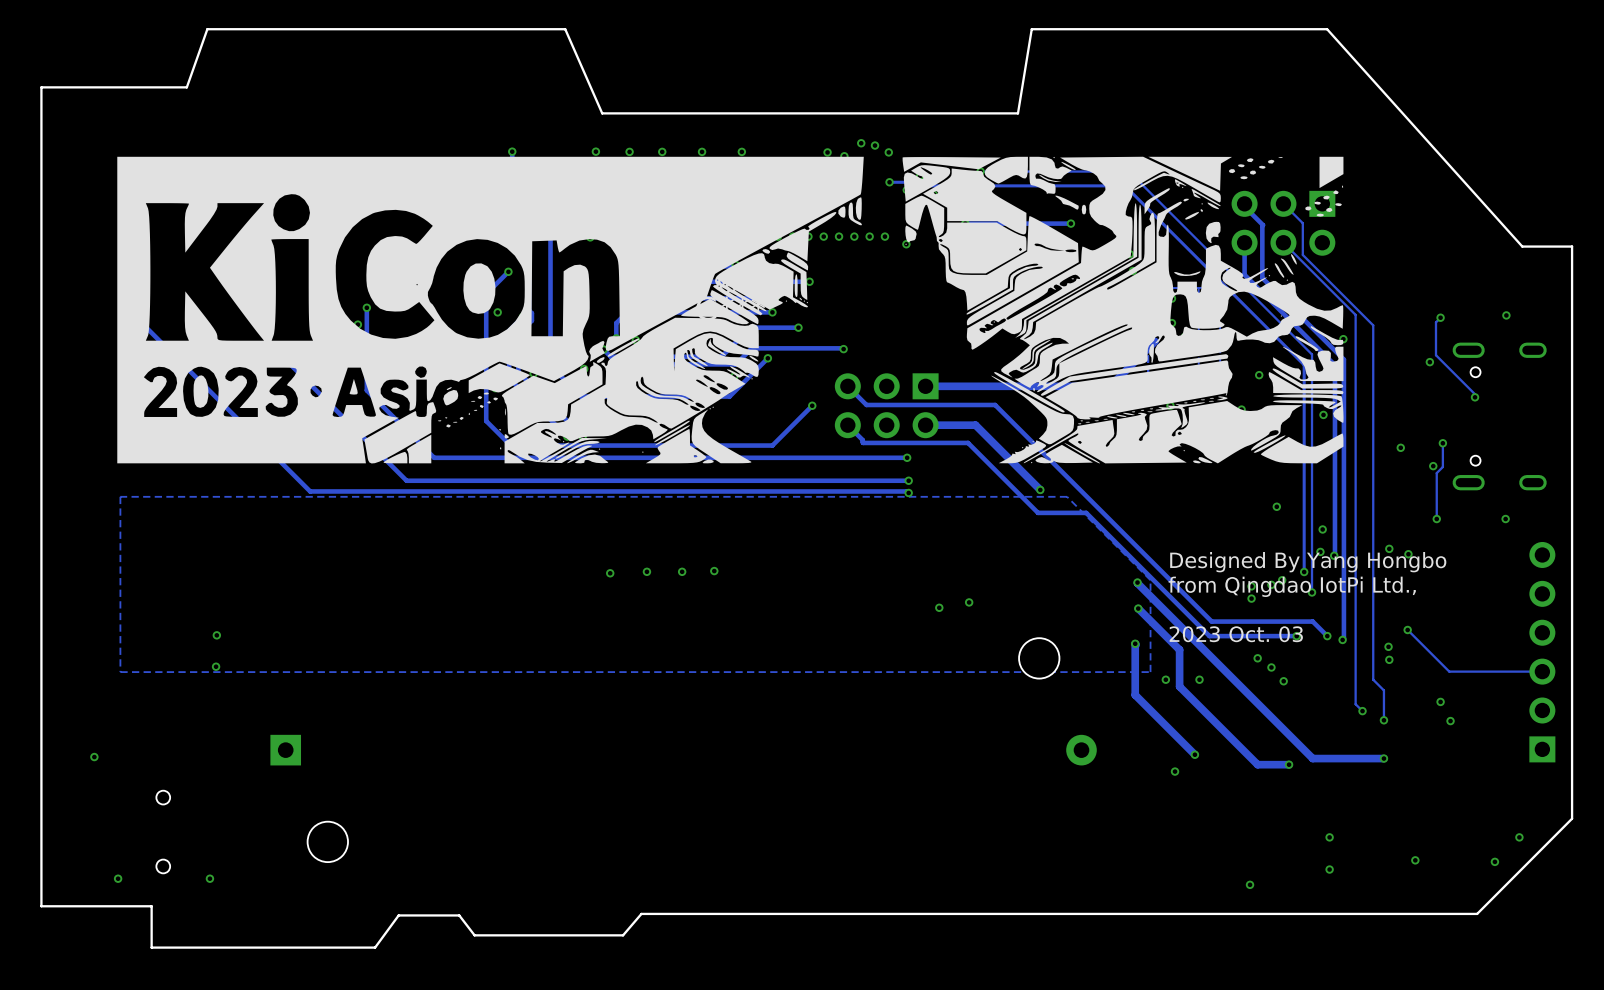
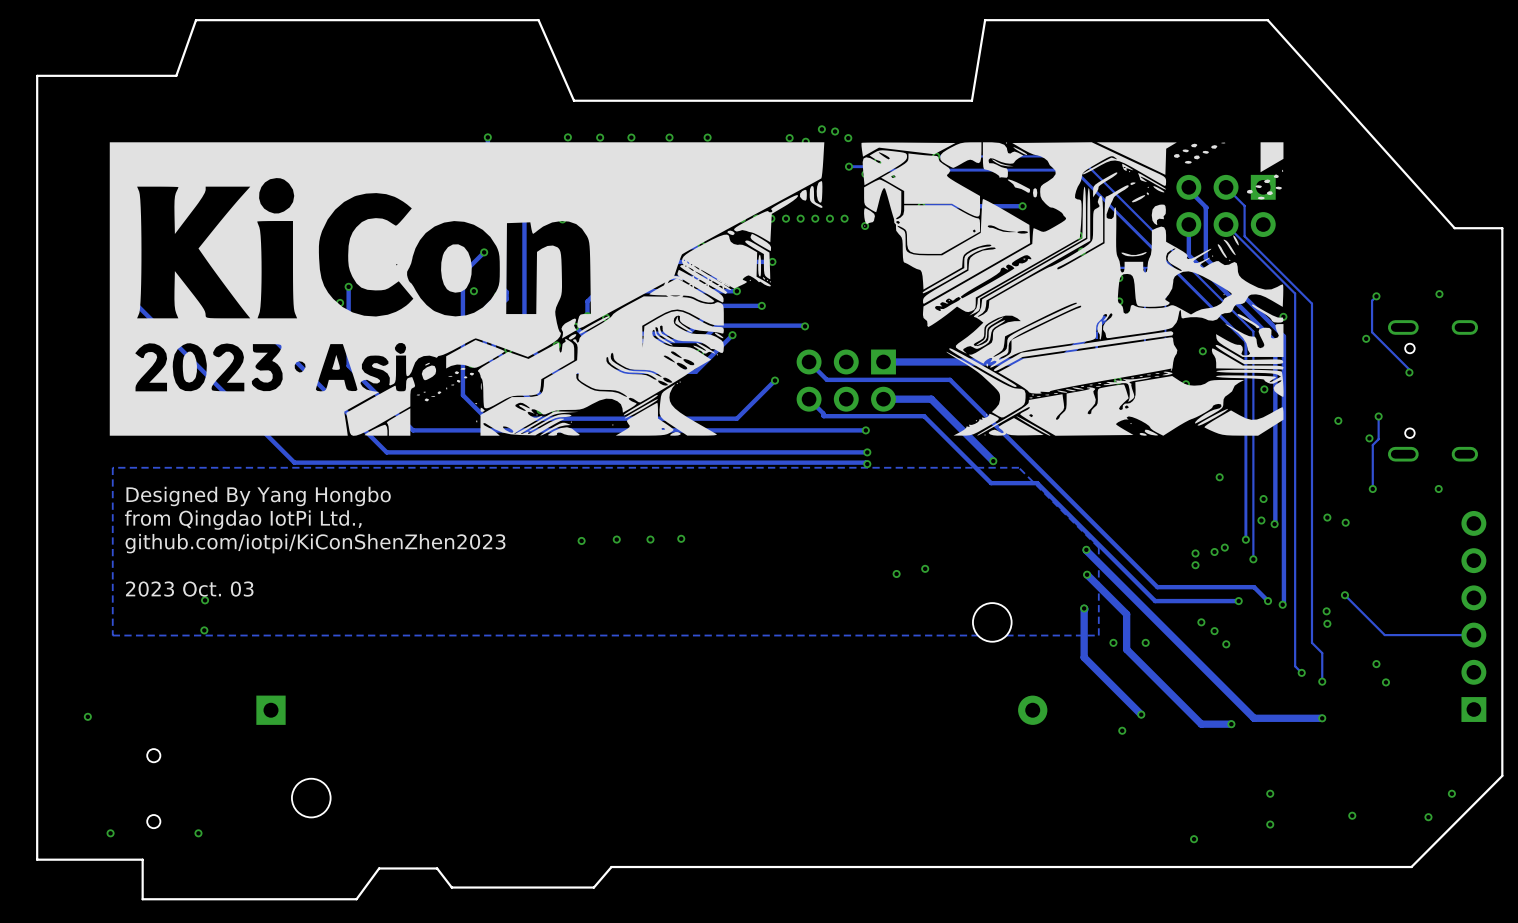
text: none -> Designed By Yang Hongbo (258, 496)
text: none -> from Qingdao IotPi Ltd., (243, 520)
text: Designed By Yang Hongbo (1308, 562) -> none
text: none -> github.com/iotpi/KiConShenZhen2023 (315, 543)
text: from Qingdao IotPi Ltd., (1292, 586) -> none
text: none -> 2023 Oct. 03 (189, 589)
text: 2023 Oct. 03 (1236, 634) -> none

